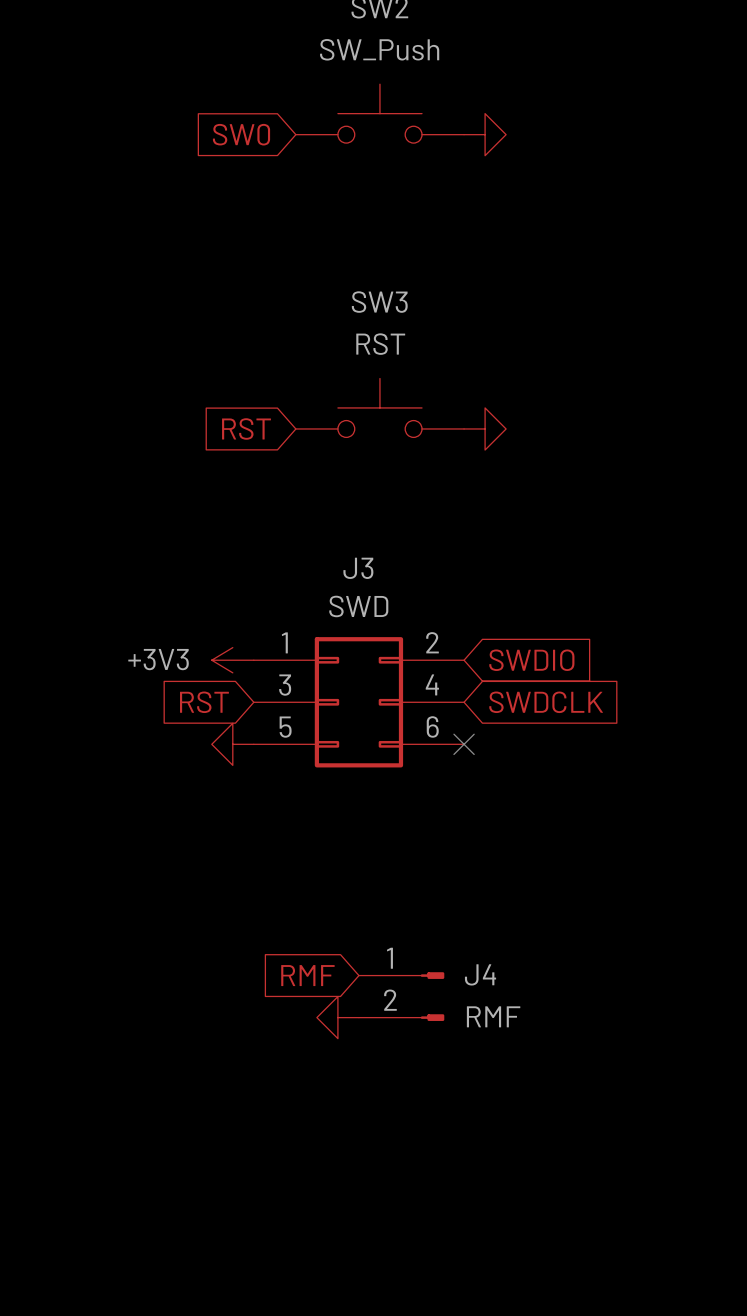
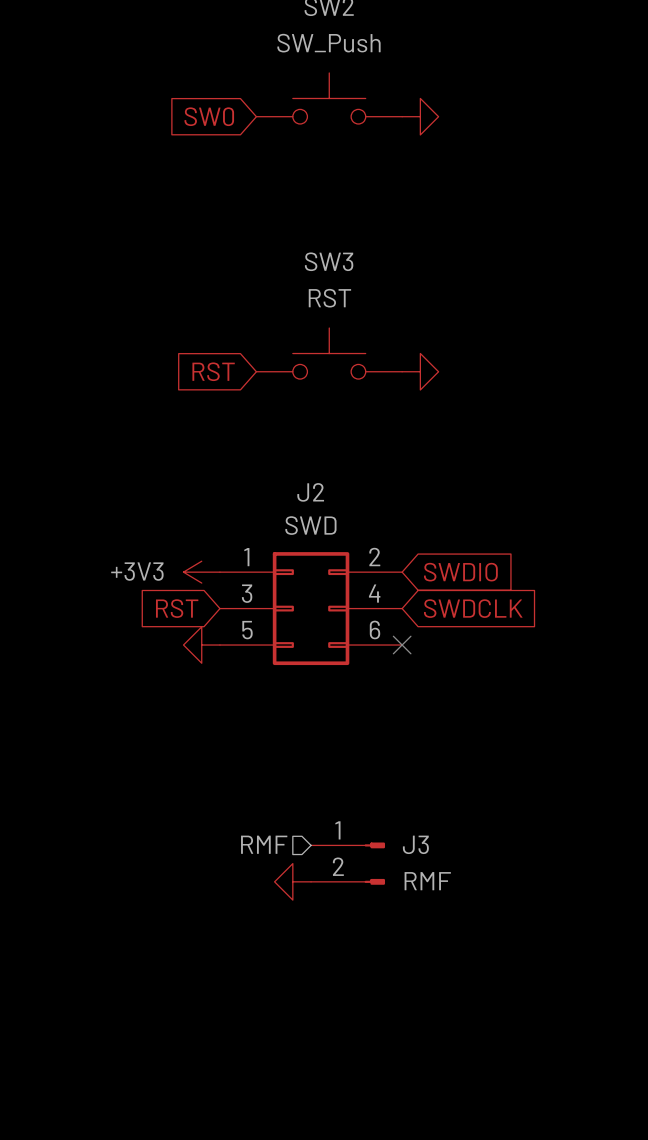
J3 name: J3 (358, 568) -> J2 (310, 492)
hierarchical label: none -> RMF (264, 844)
J4 name: J4 (480, 974) -> J3 (415, 844)
global label: RMF (307, 975) -> none

